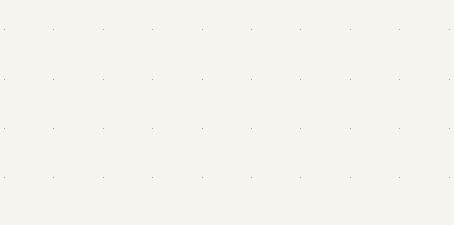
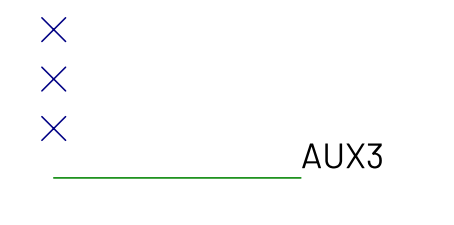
no-connect mark: none -> (53, 29)
no-connect mark: none -> (53, 79)
no-connect mark: none -> (53, 128)
label: none -> AUX3 (341, 155)
wire: none -> (53, 177) (300, 177)

